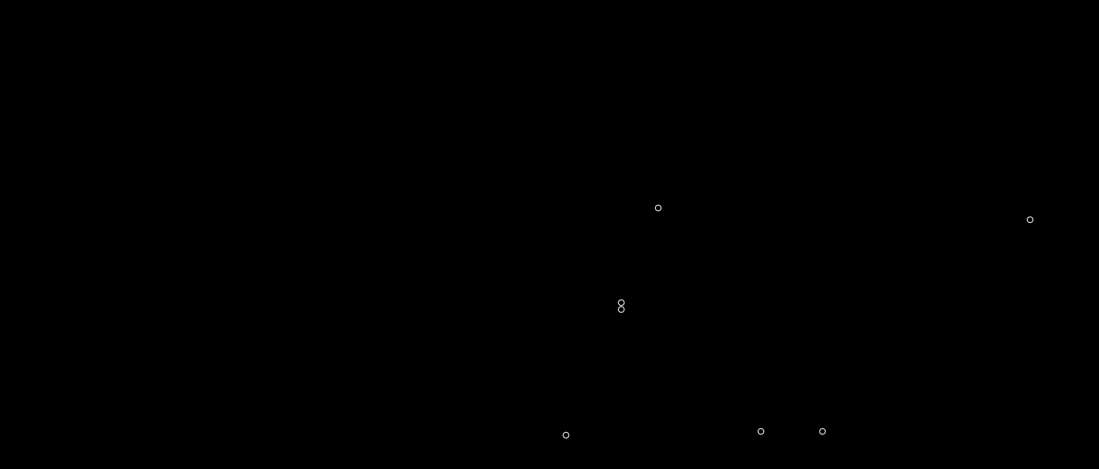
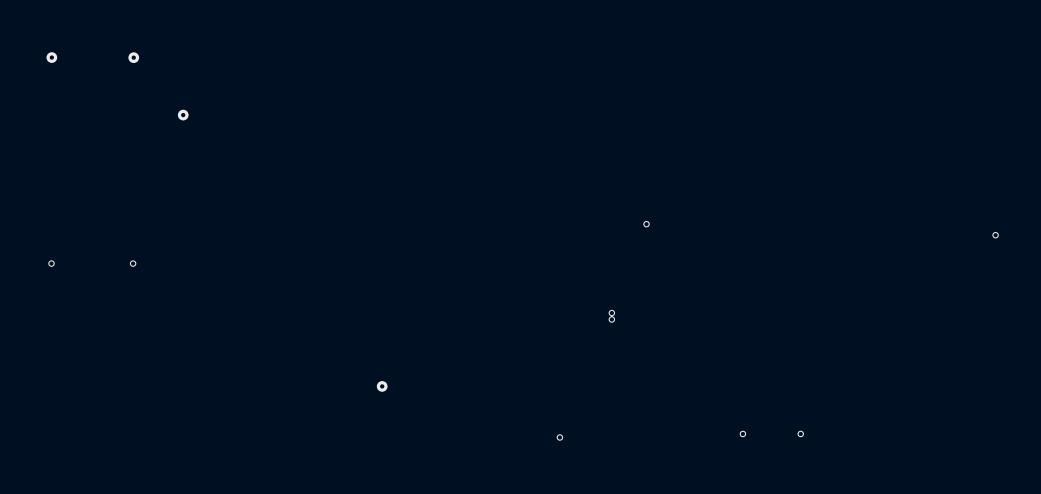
via: none -> (51, 57)
via: none -> (133, 57)
via: none -> (183, 115)
via: none -> (51, 263)
via: none -> (133, 263)
via: none -> (382, 386)

